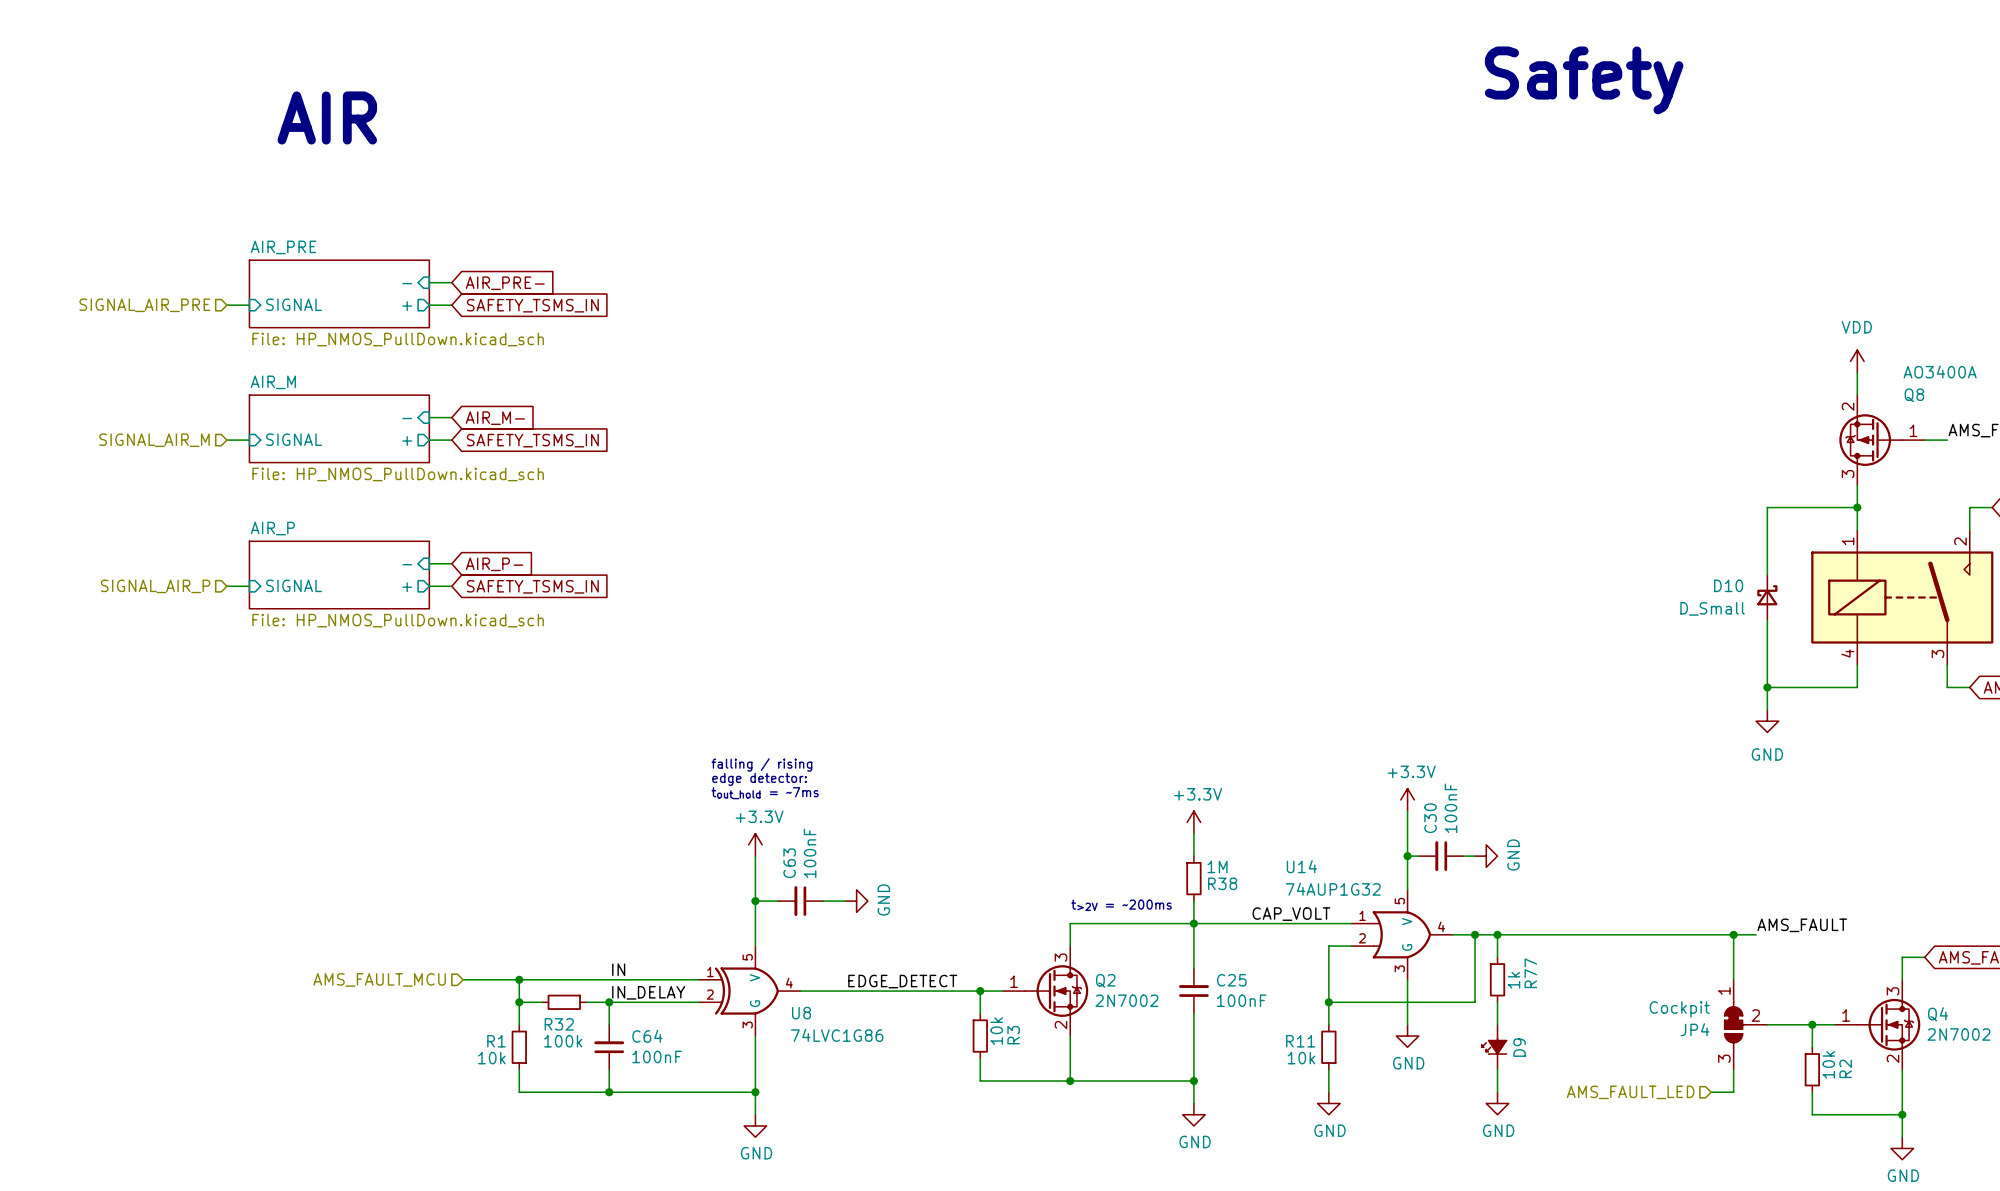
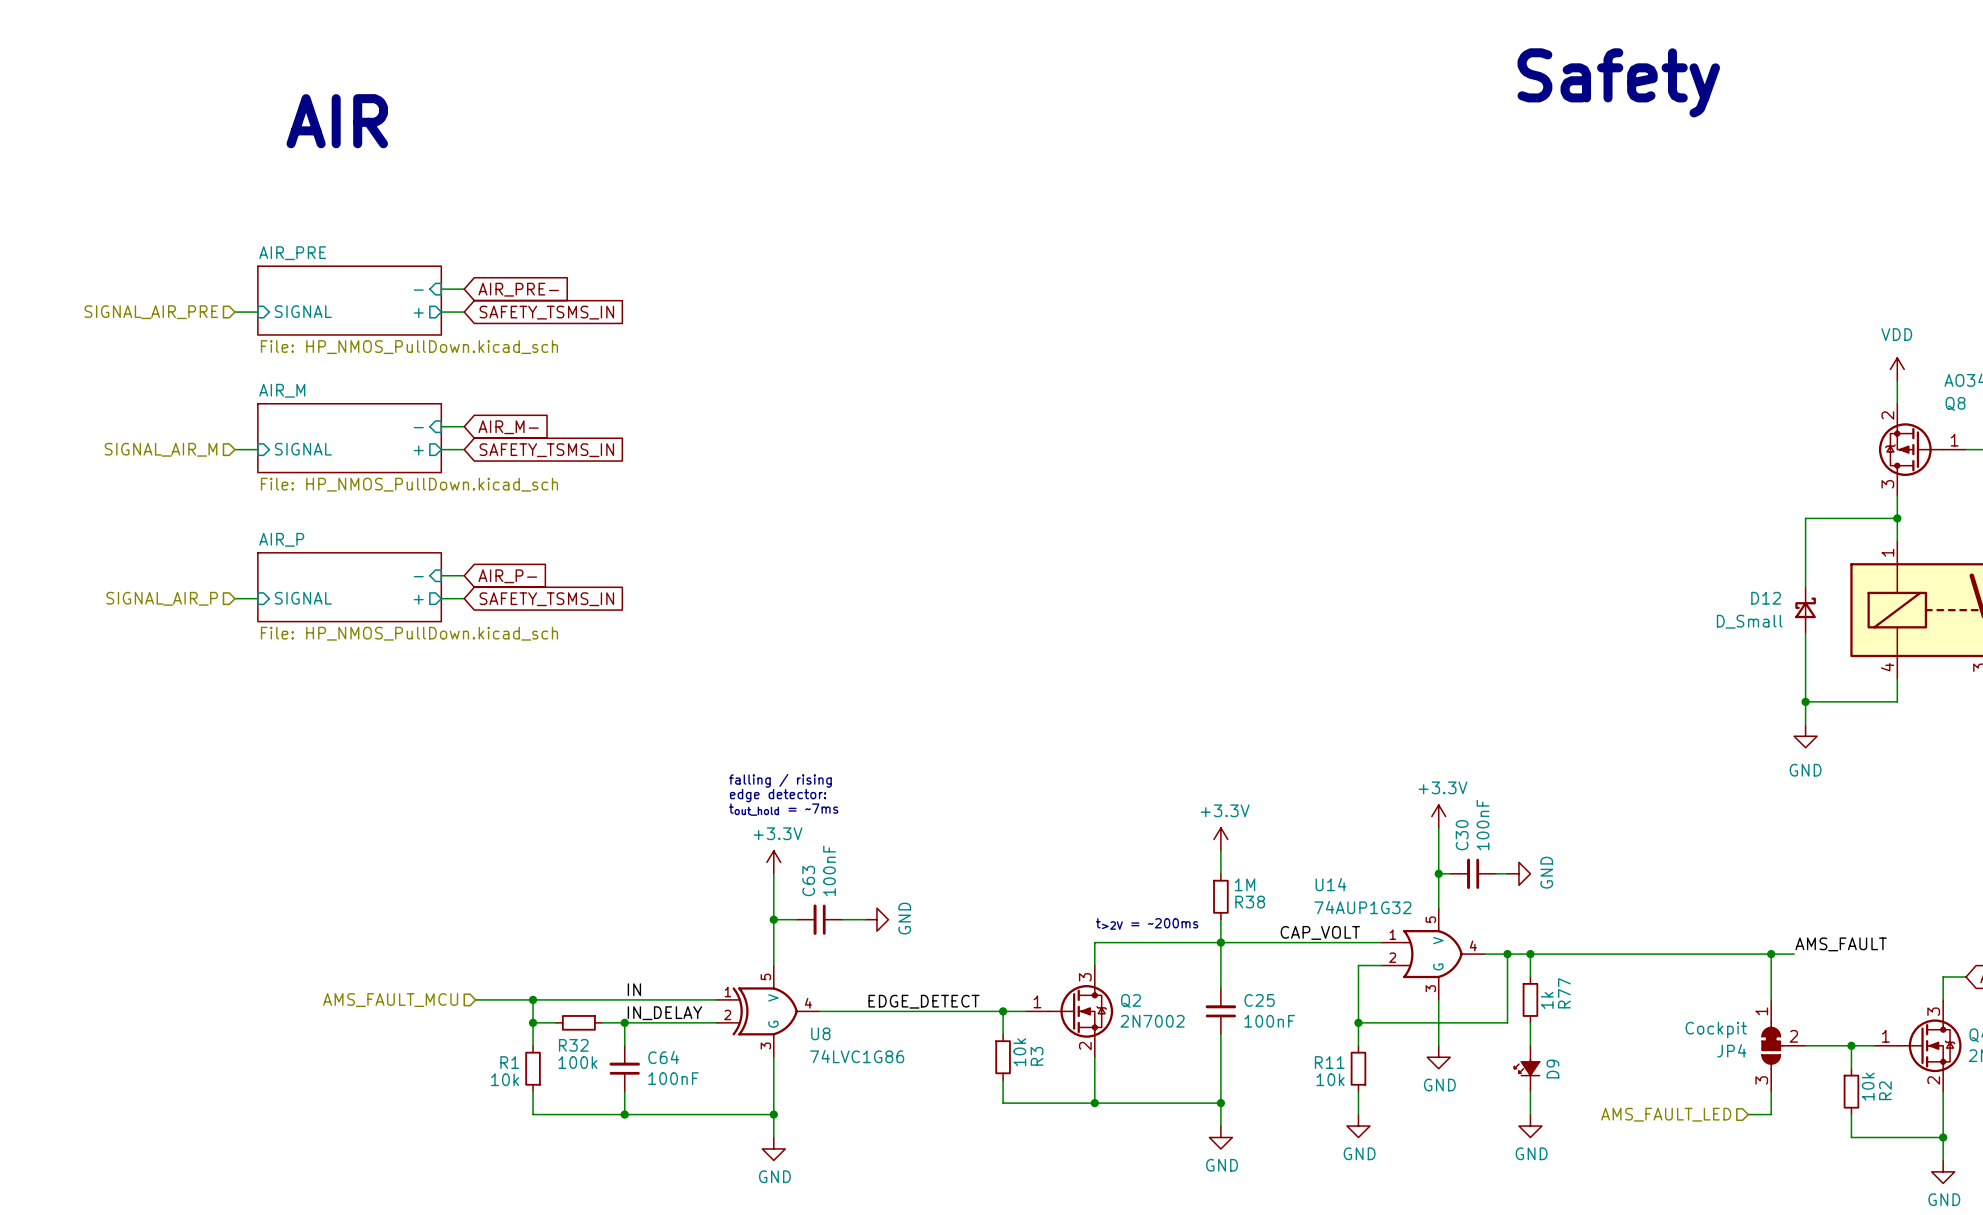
D10 name: D10 (1728, 585) -> D12 (1766, 598)

